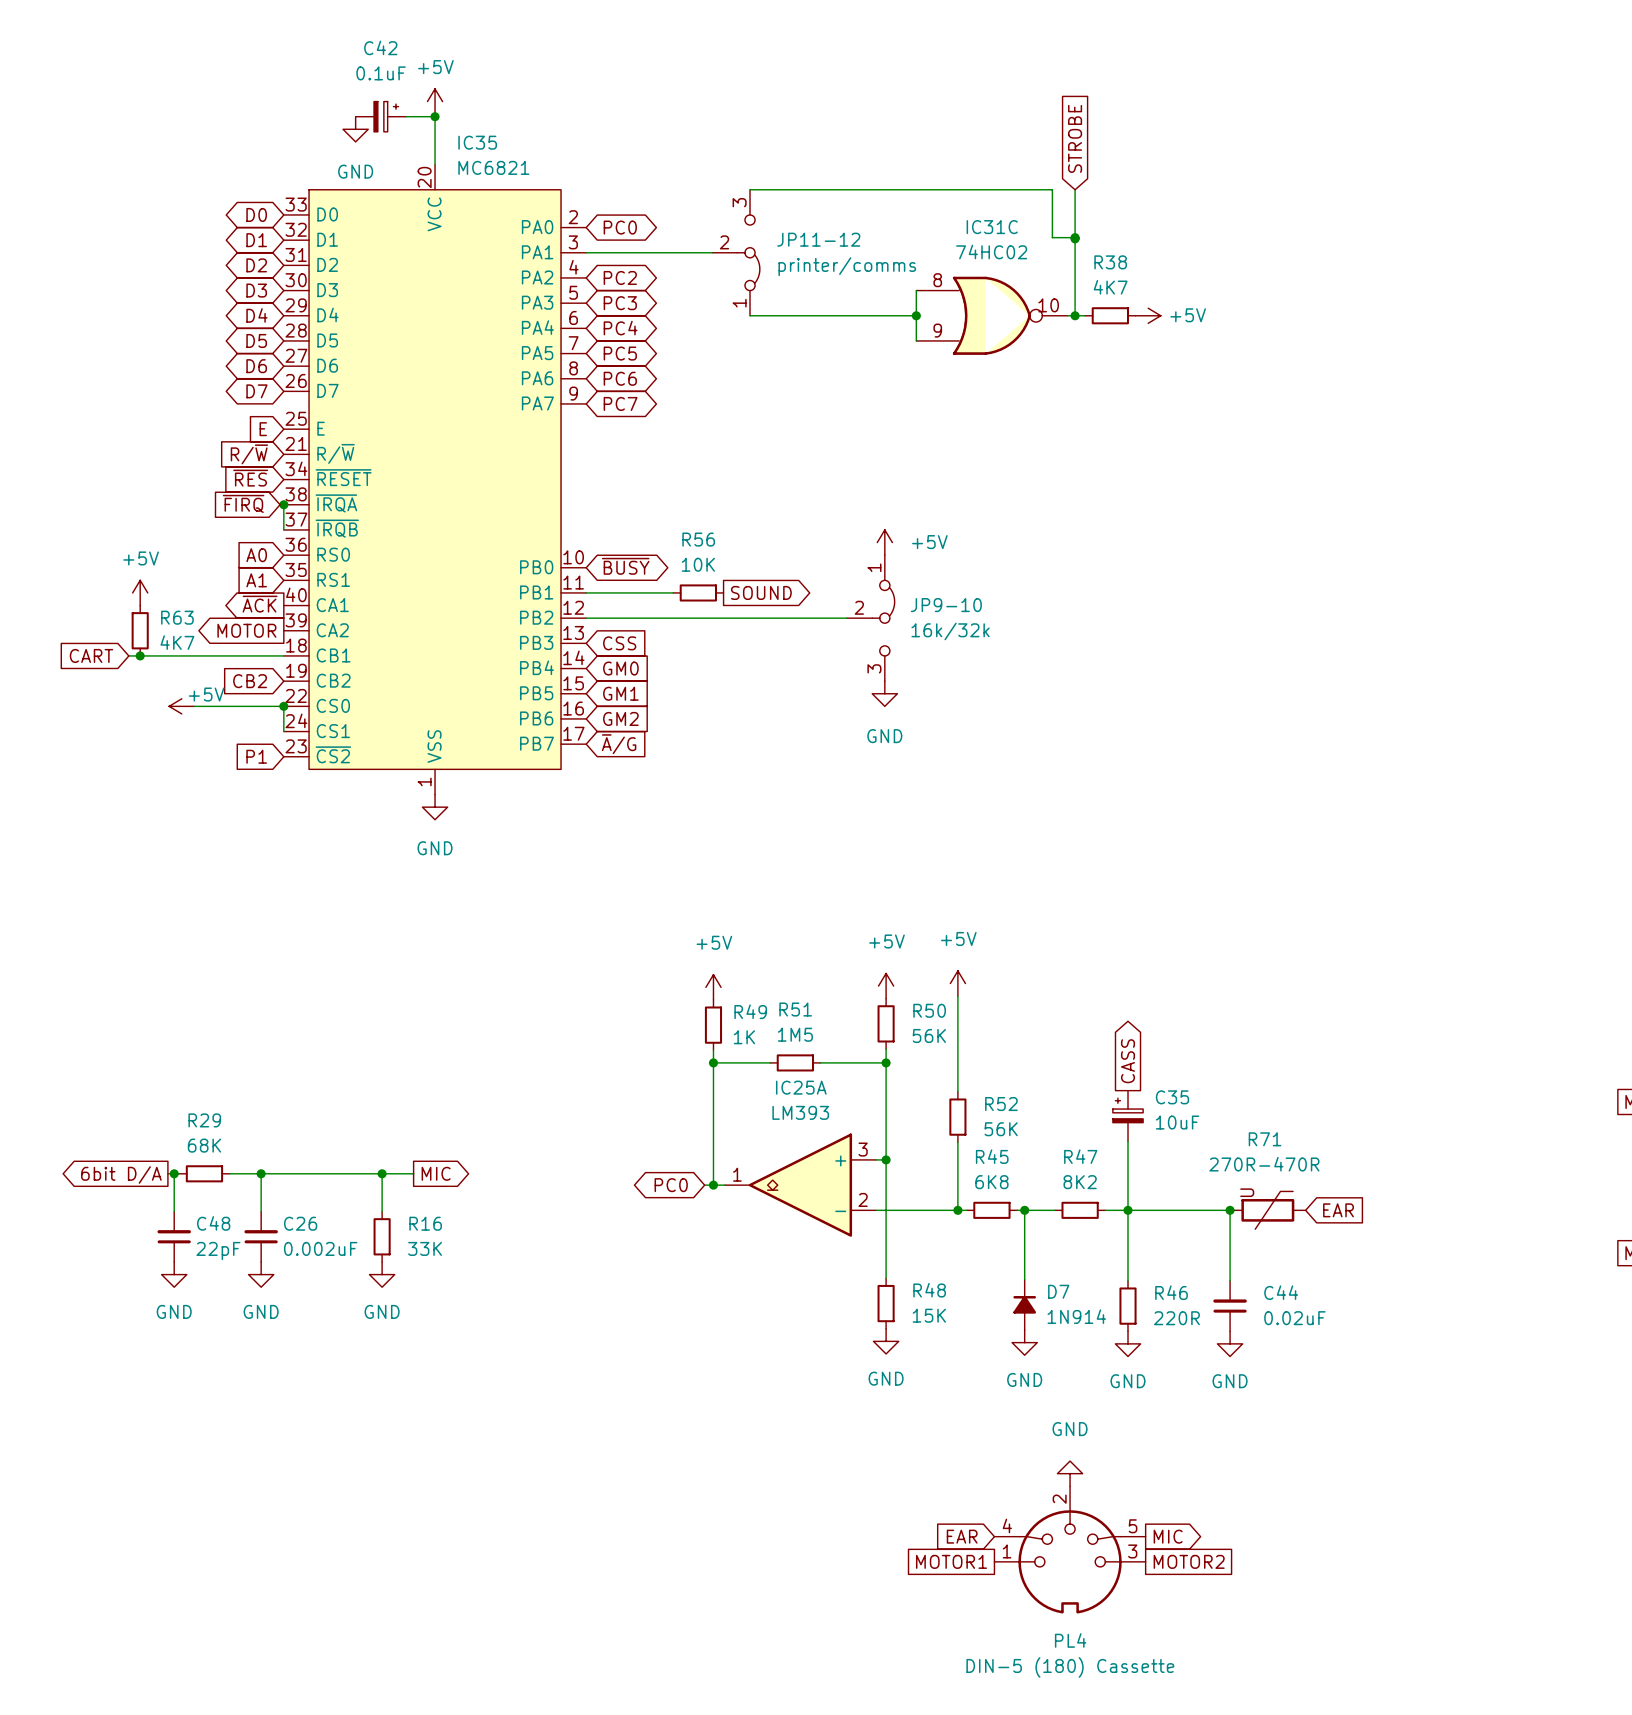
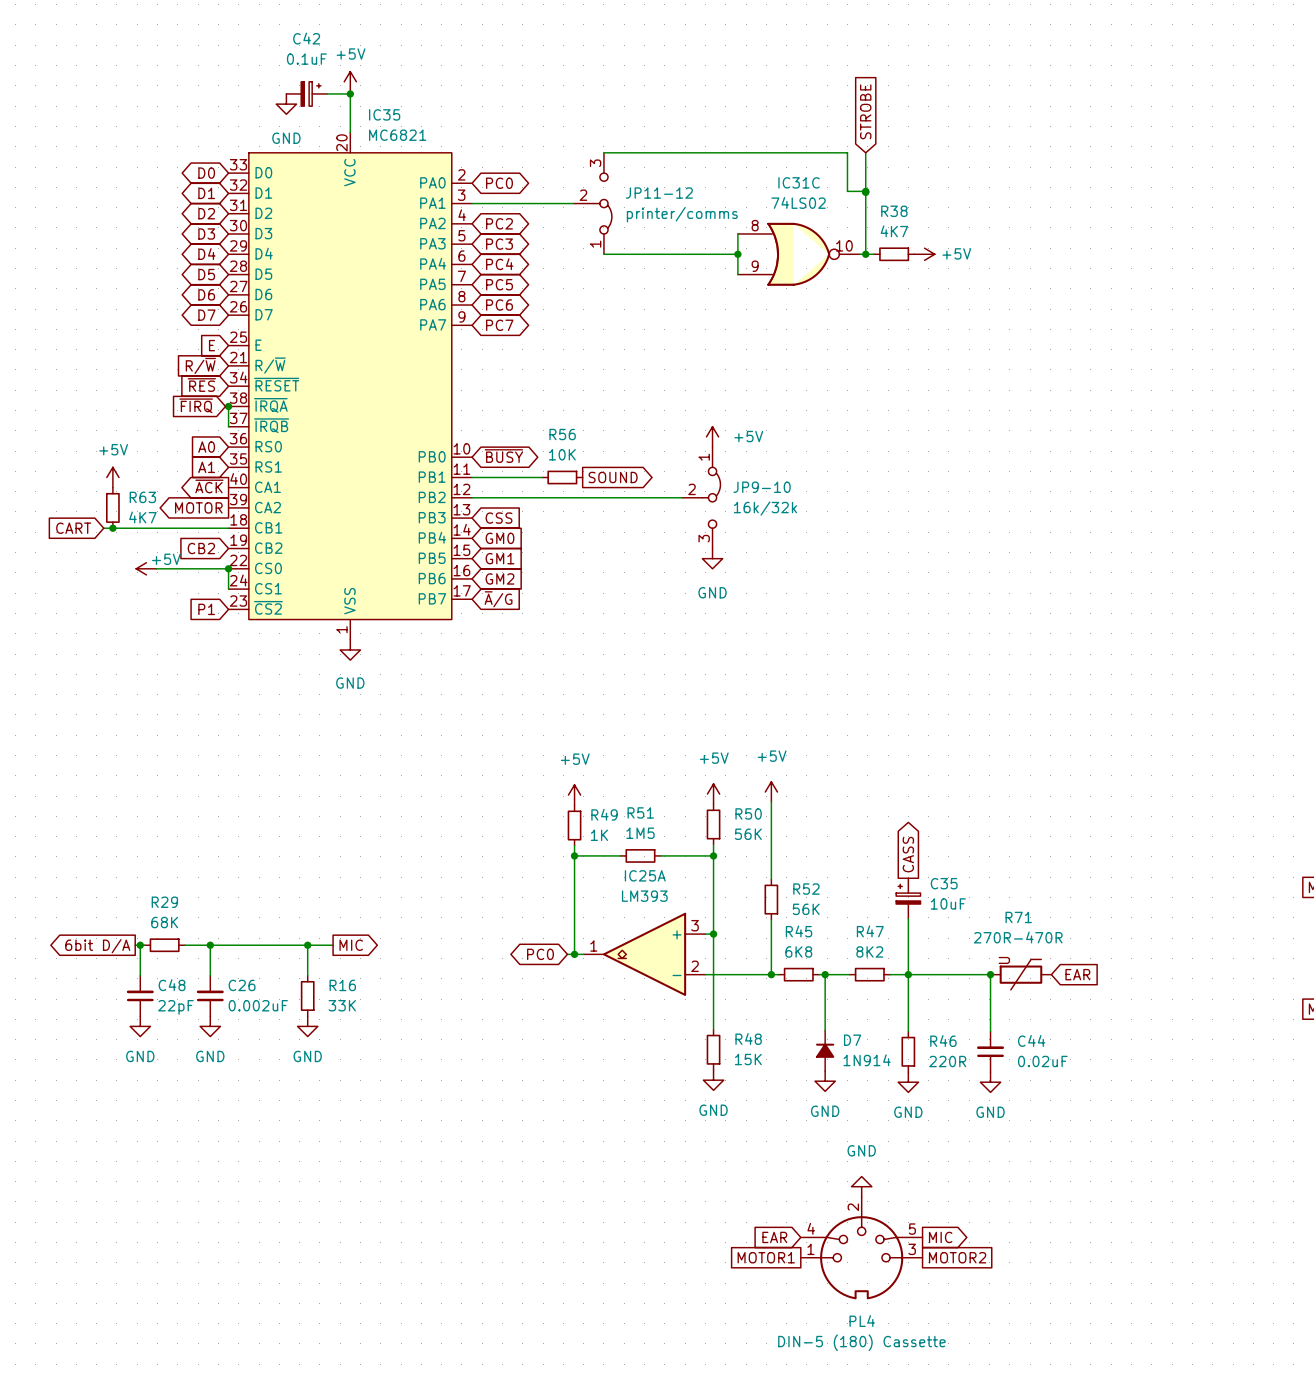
IC31C value: 74HC02 (991, 252) -> 74LS02 (798, 202)

